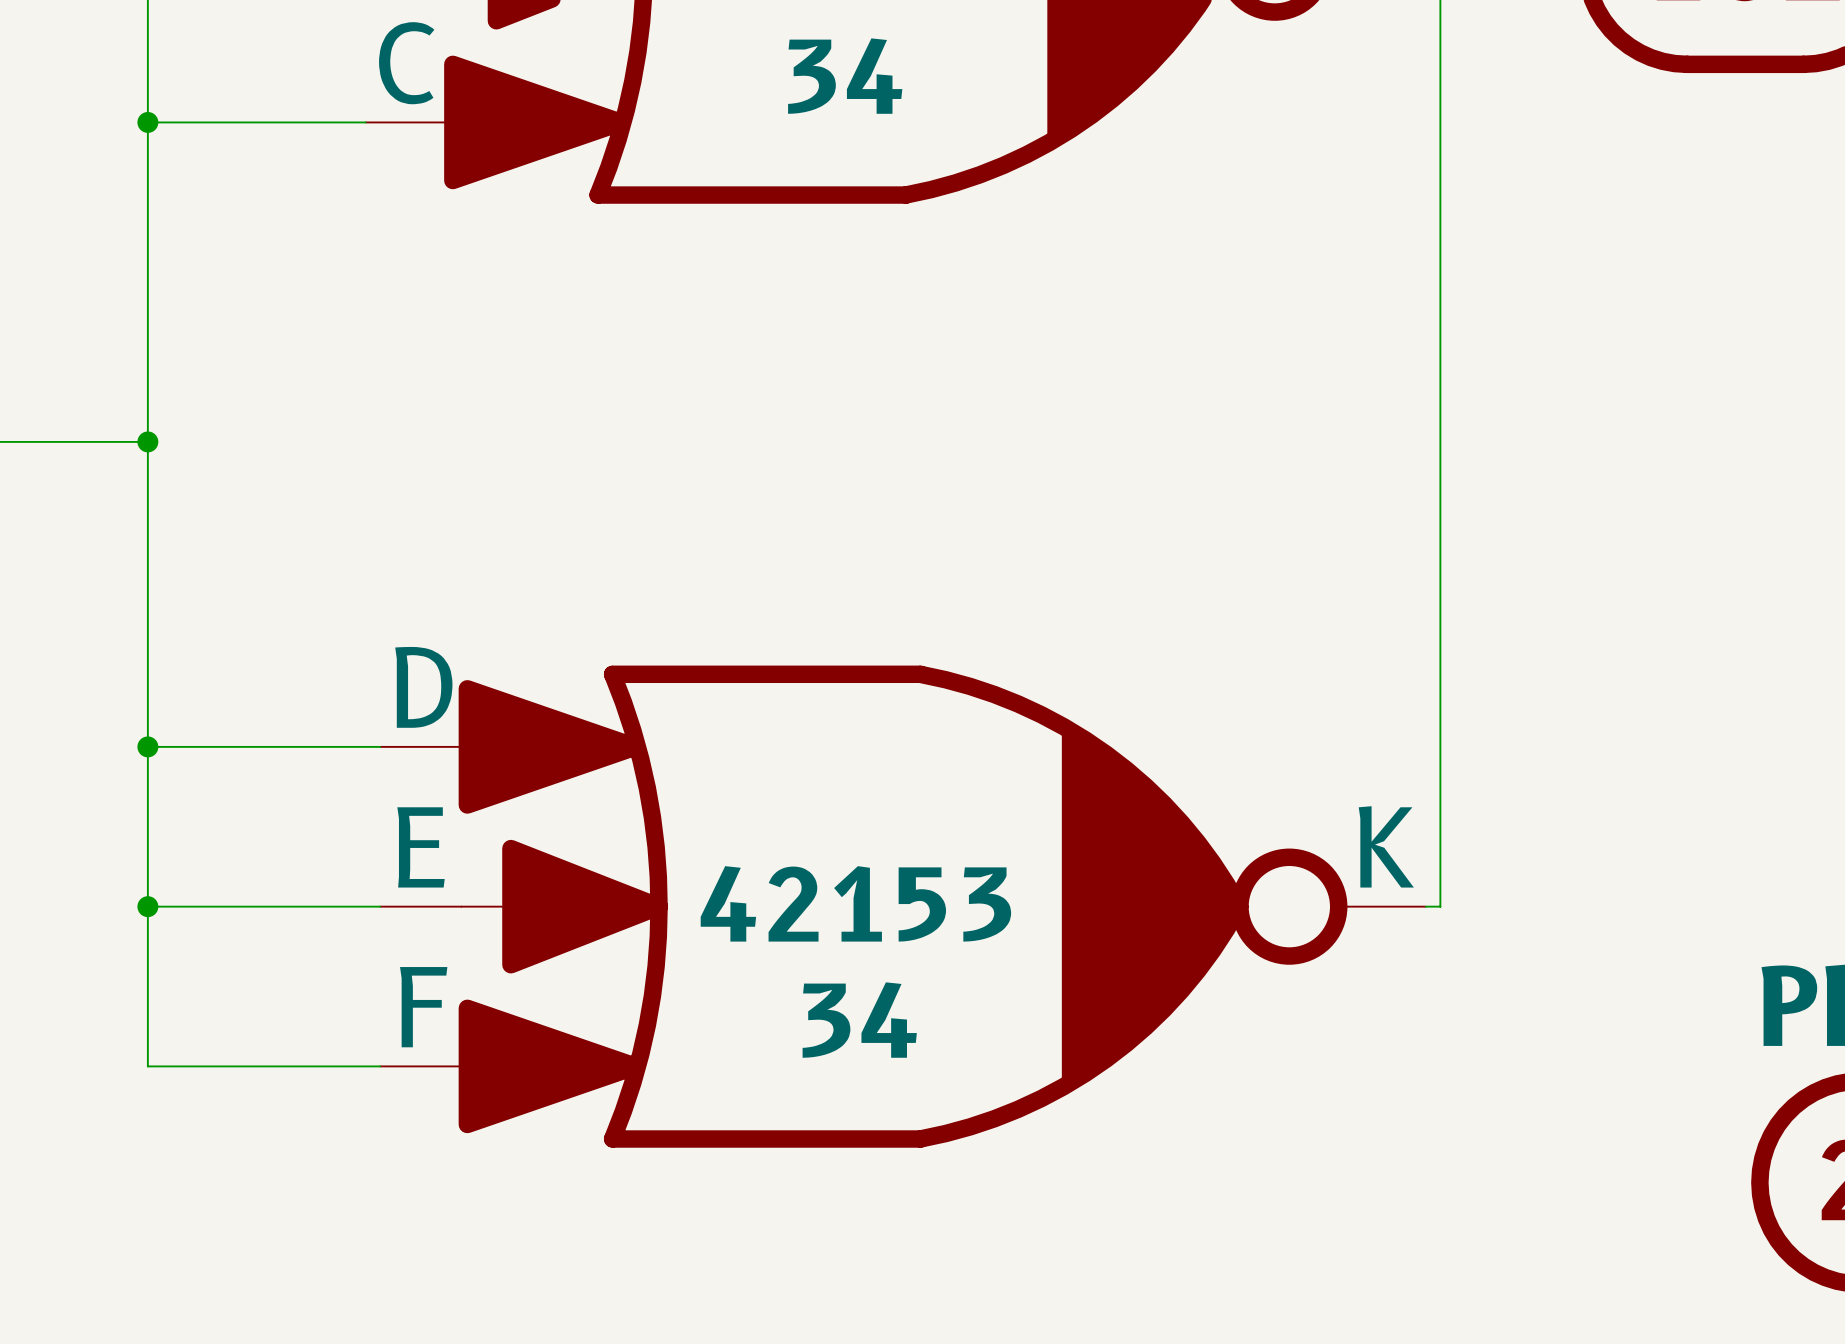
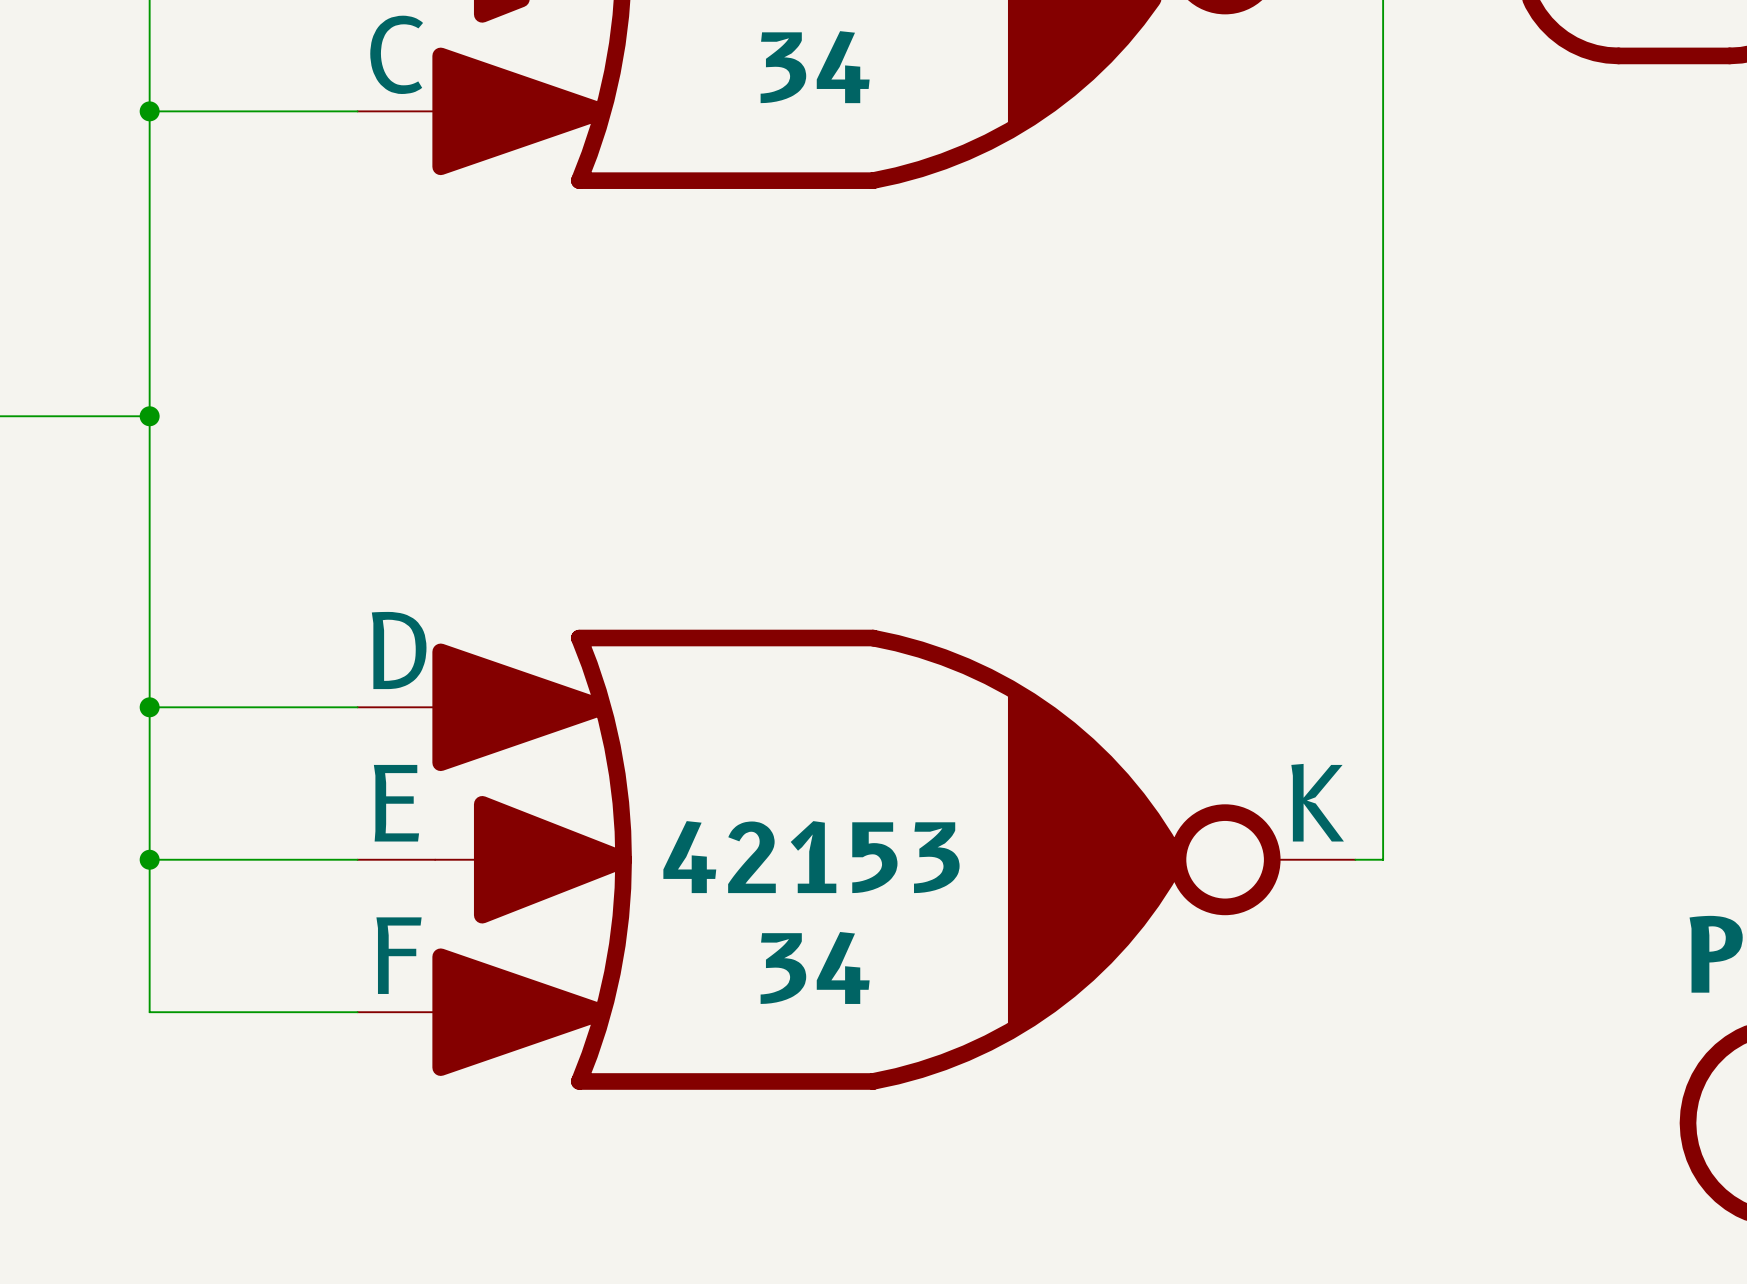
part position: (903, 906) -> (856, 859)

